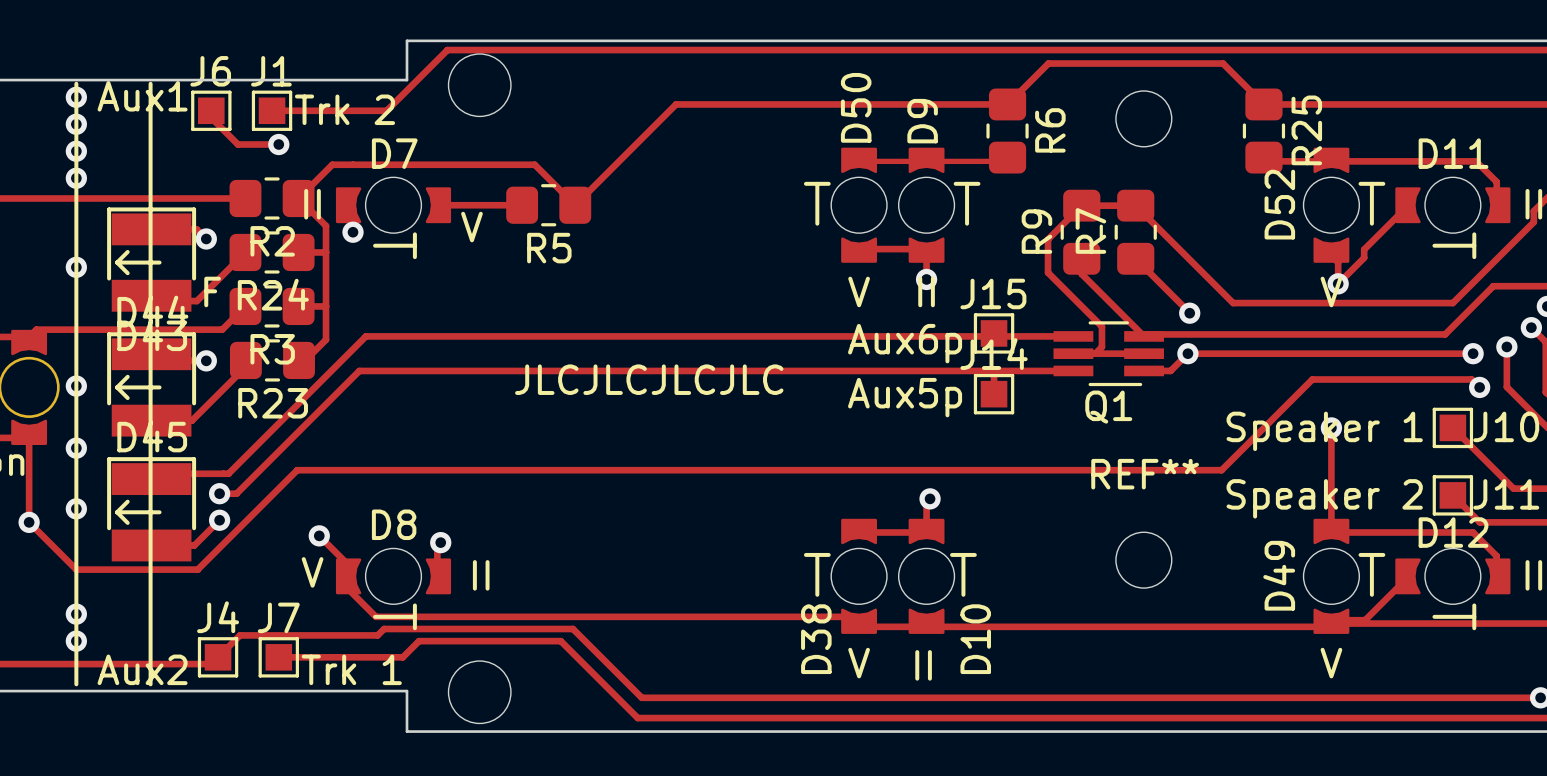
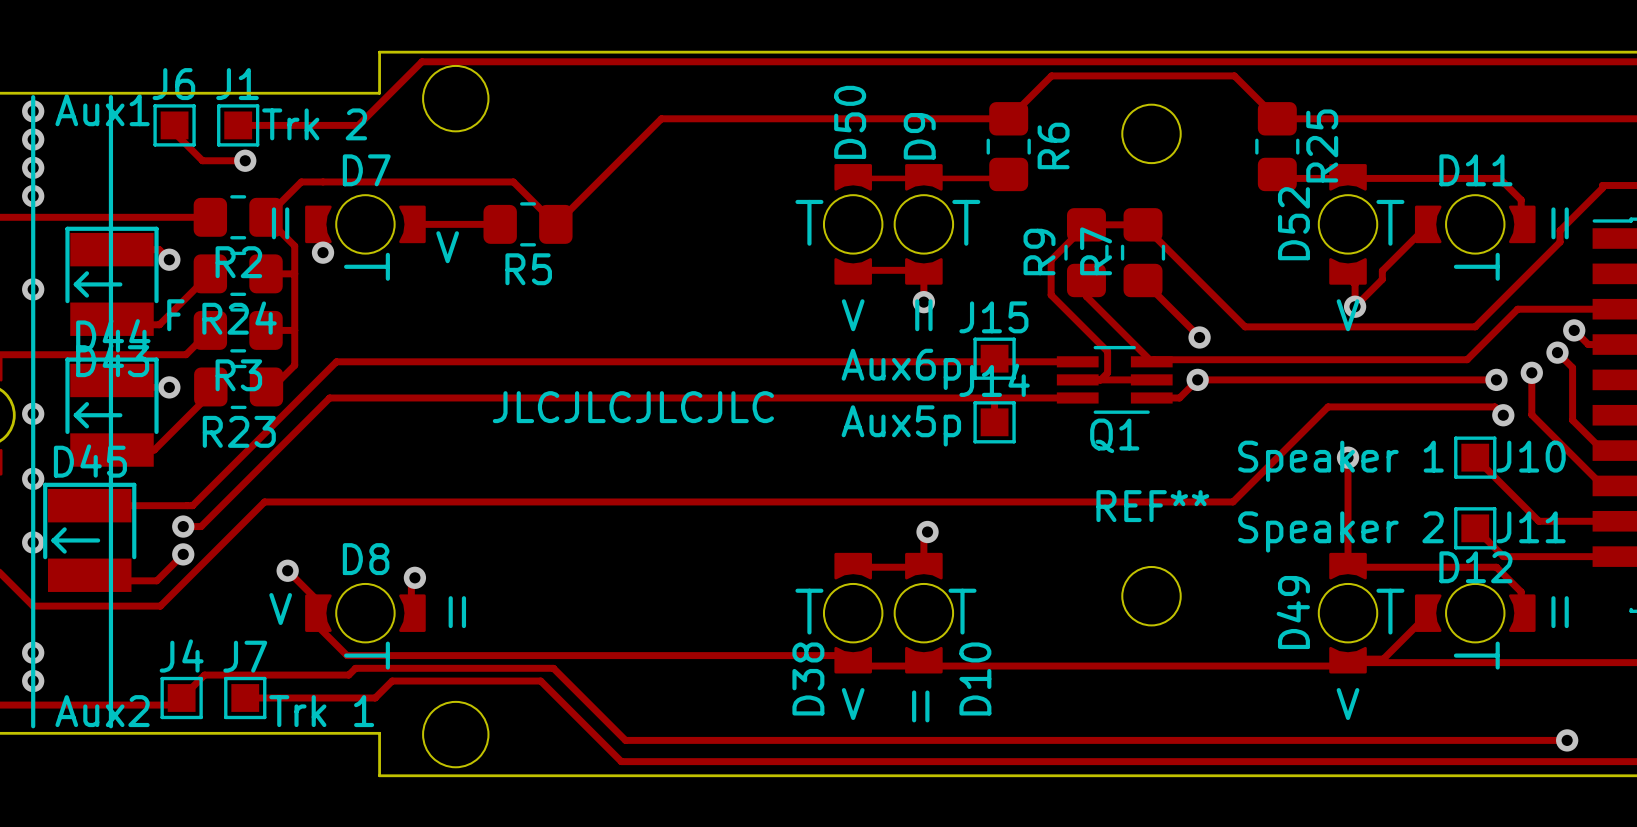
D45 position: (151, 509) -> (89, 537)

